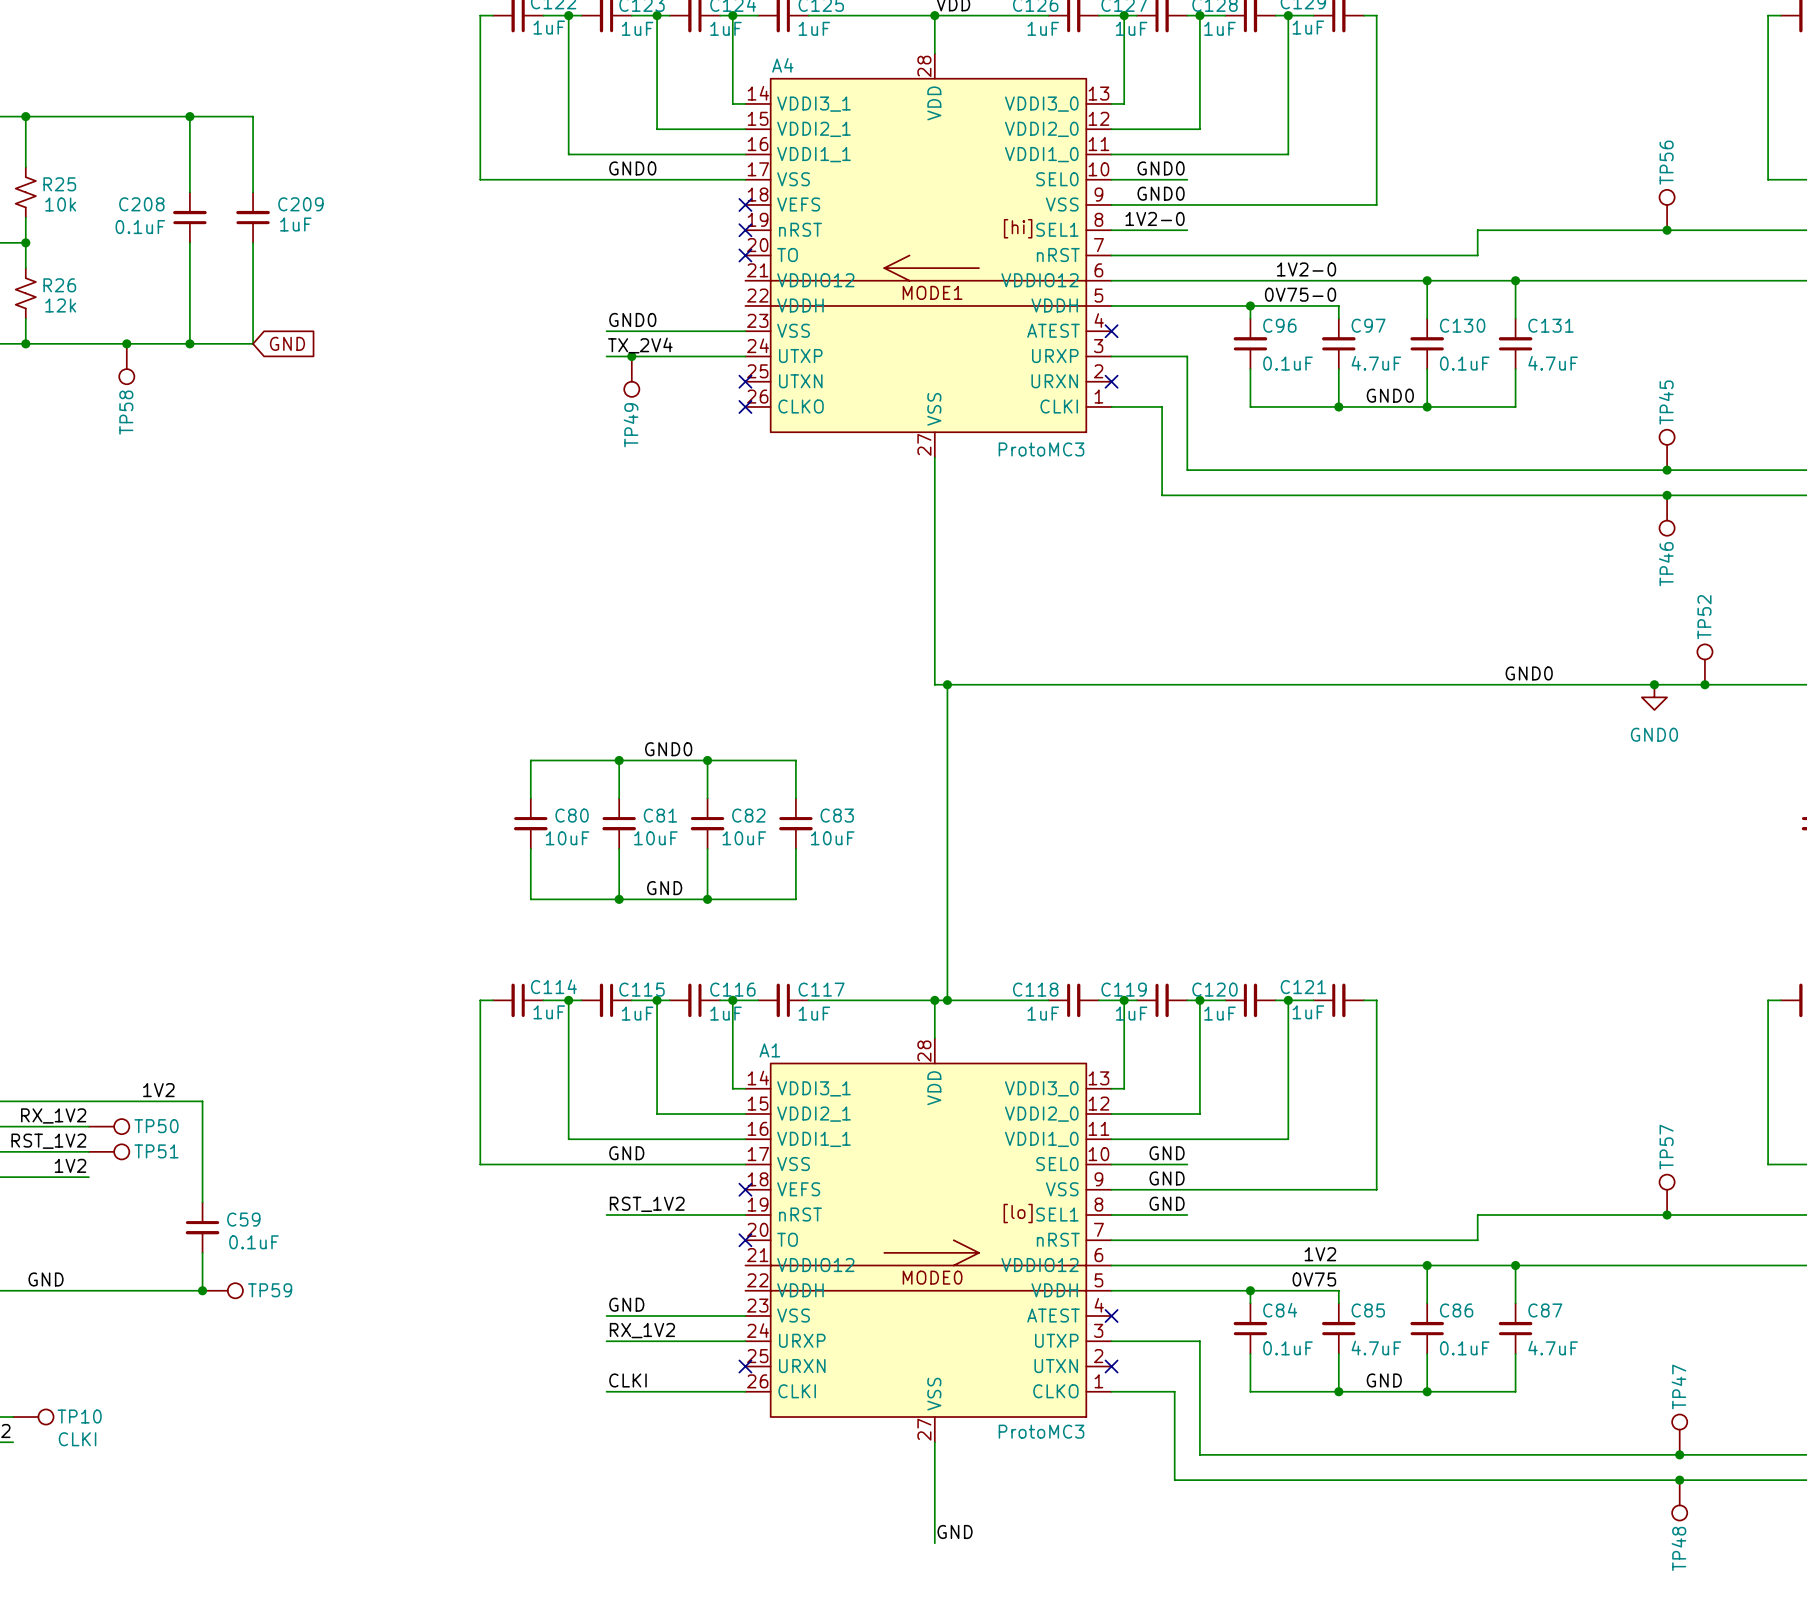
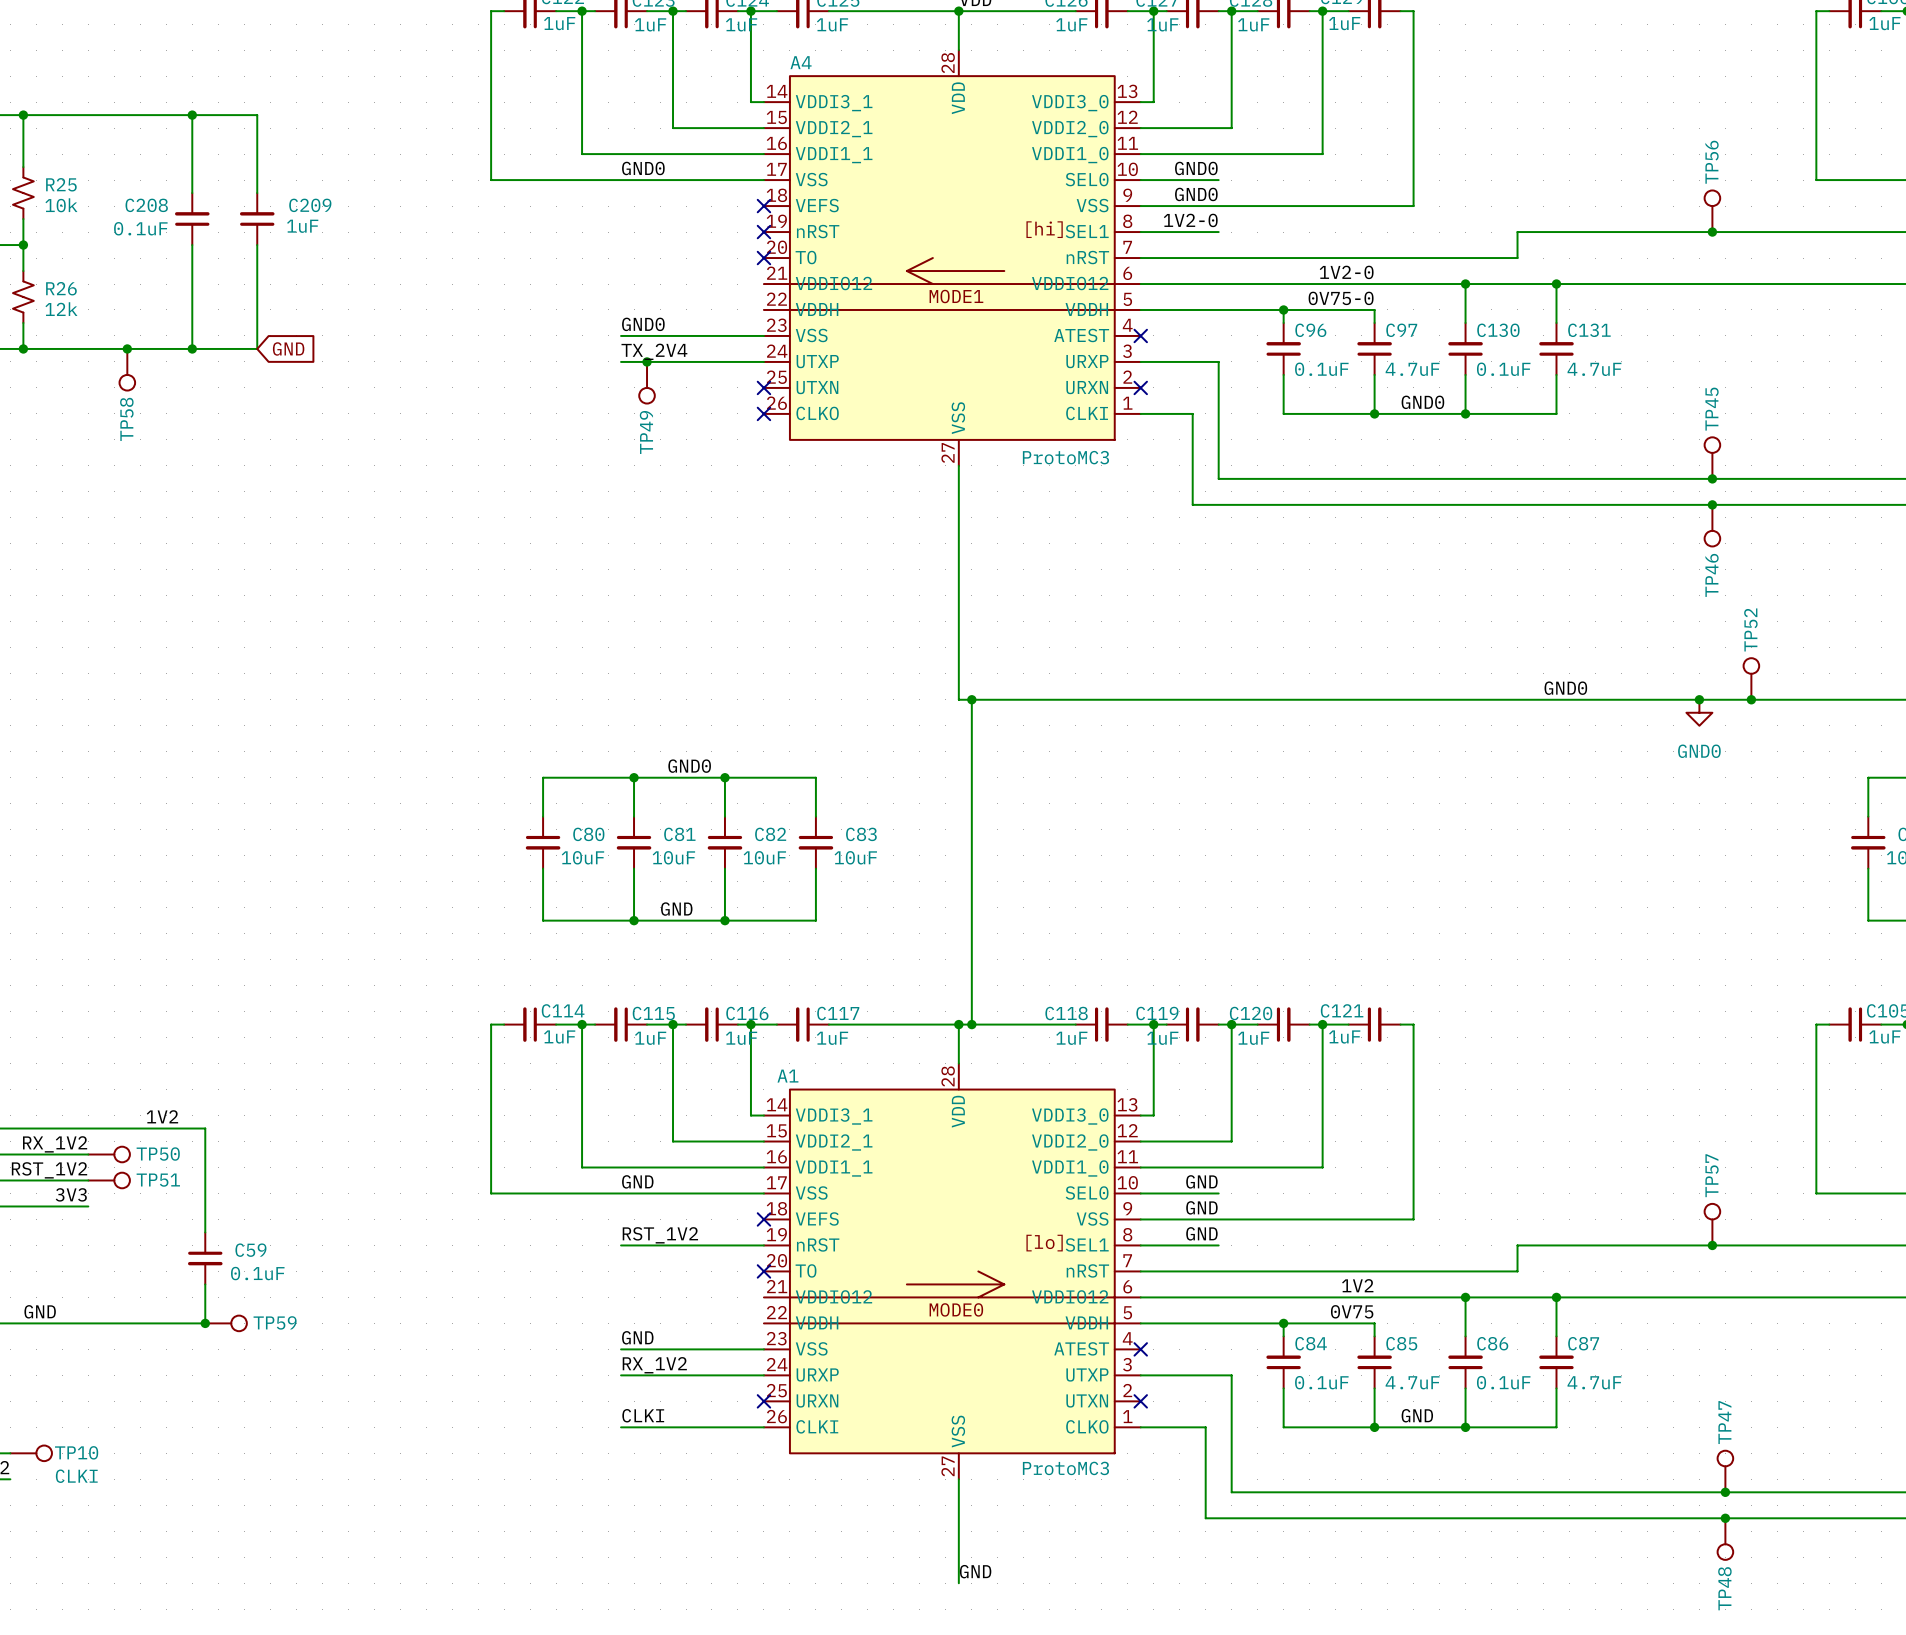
label: 1V2 (70, 1165) -> 3V3 (71, 1194)

